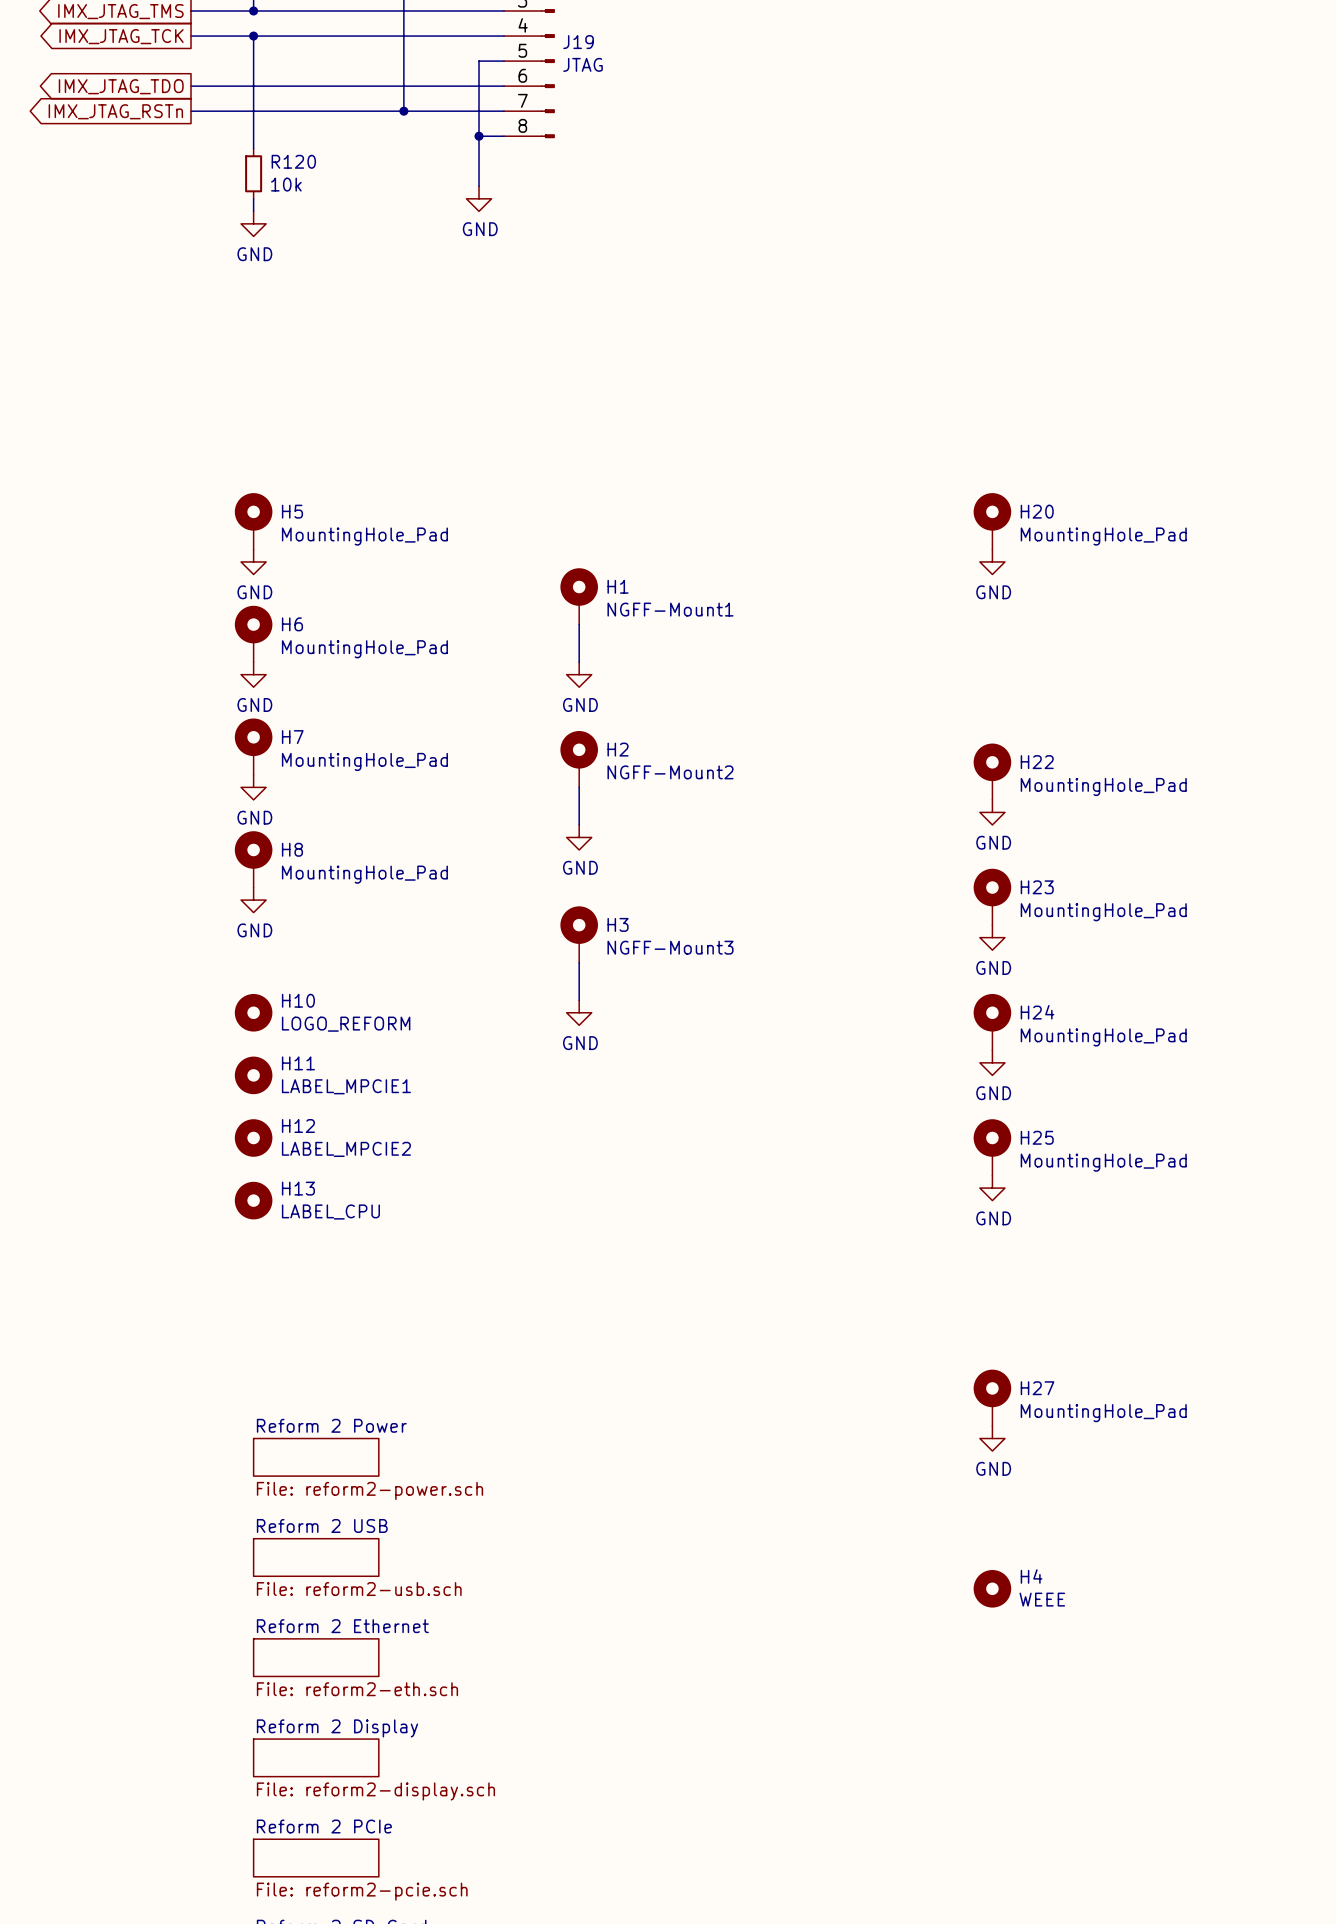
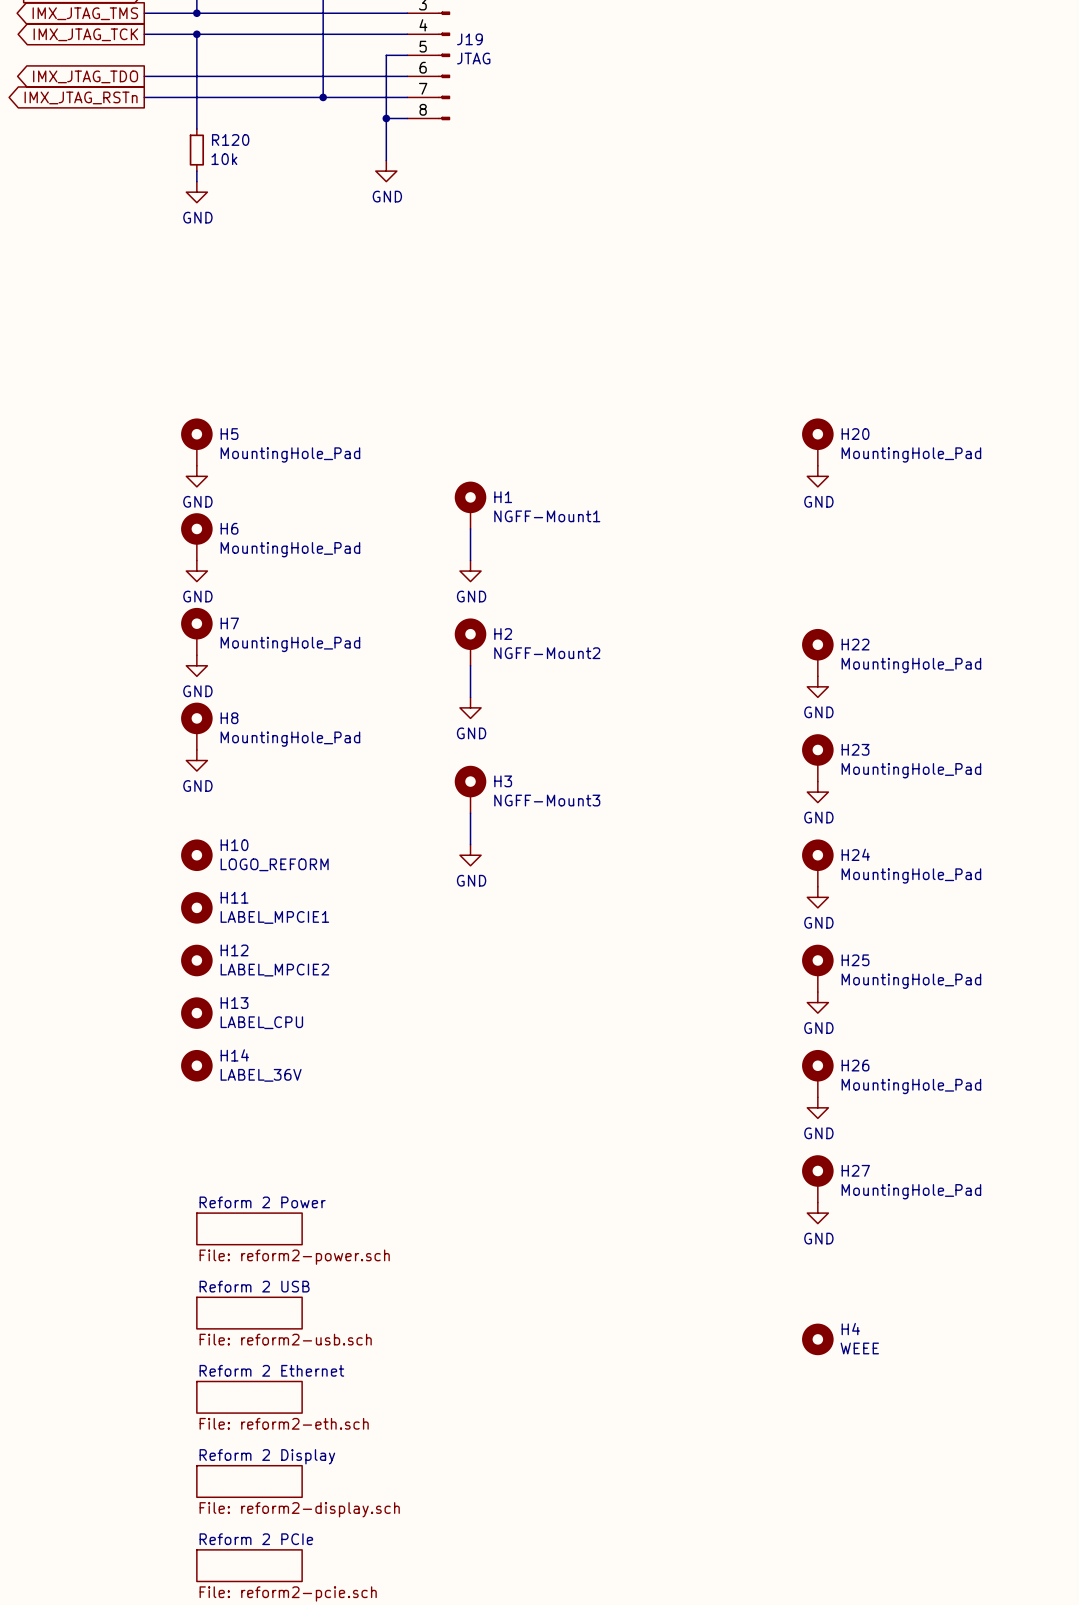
H14: none -> LABEL_36V (196, 1065)
H26: none -> MountingHole_Pad (817, 1073)
power symbol: none -> GND (817, 1107)

